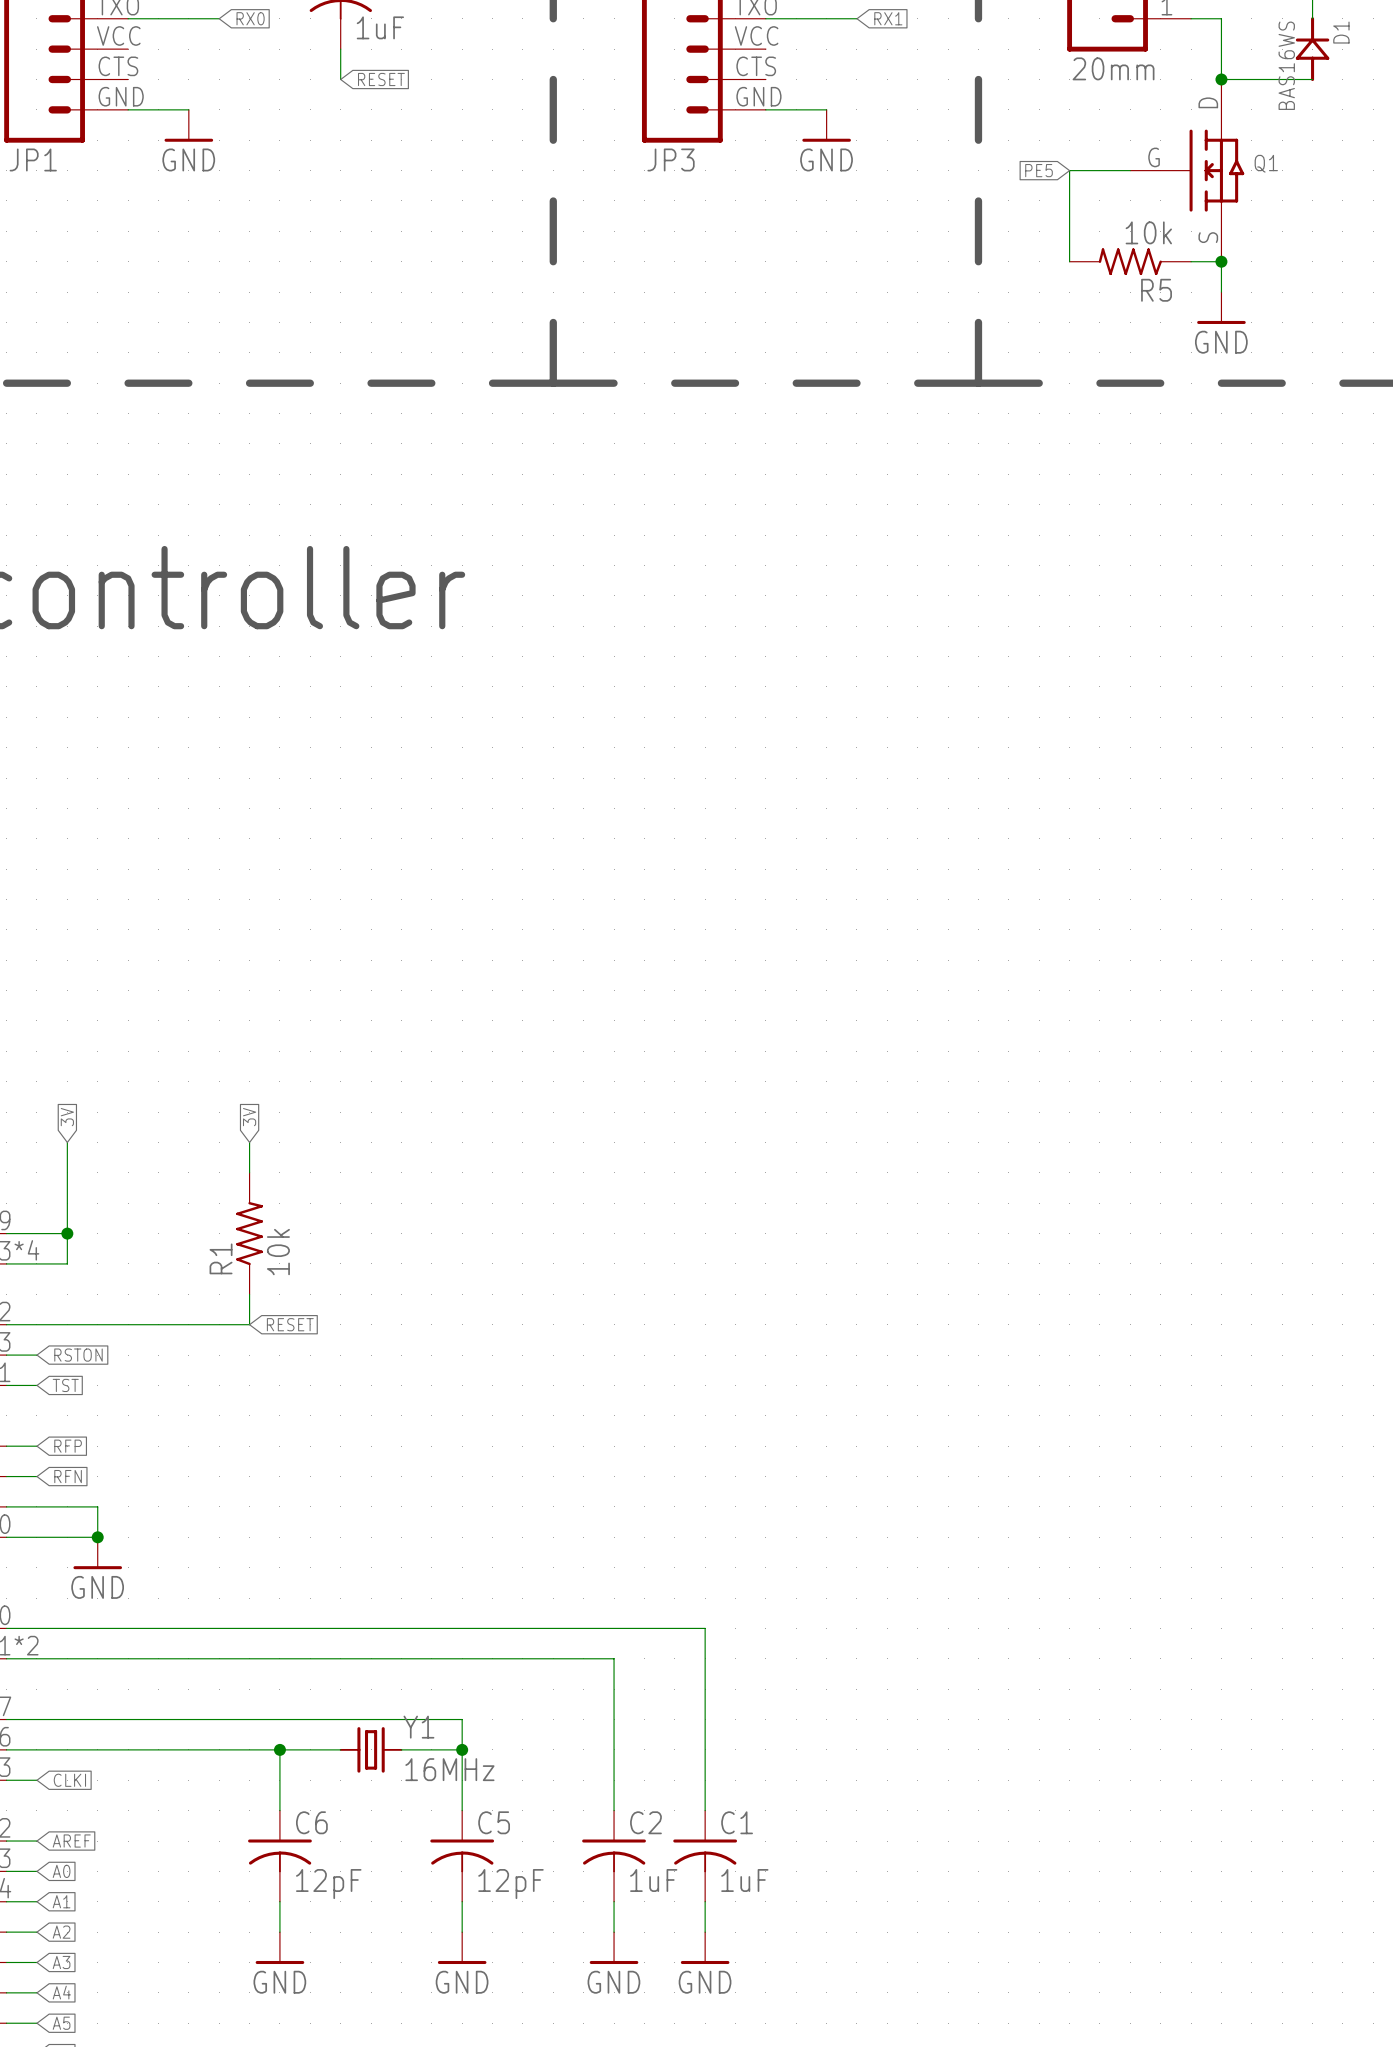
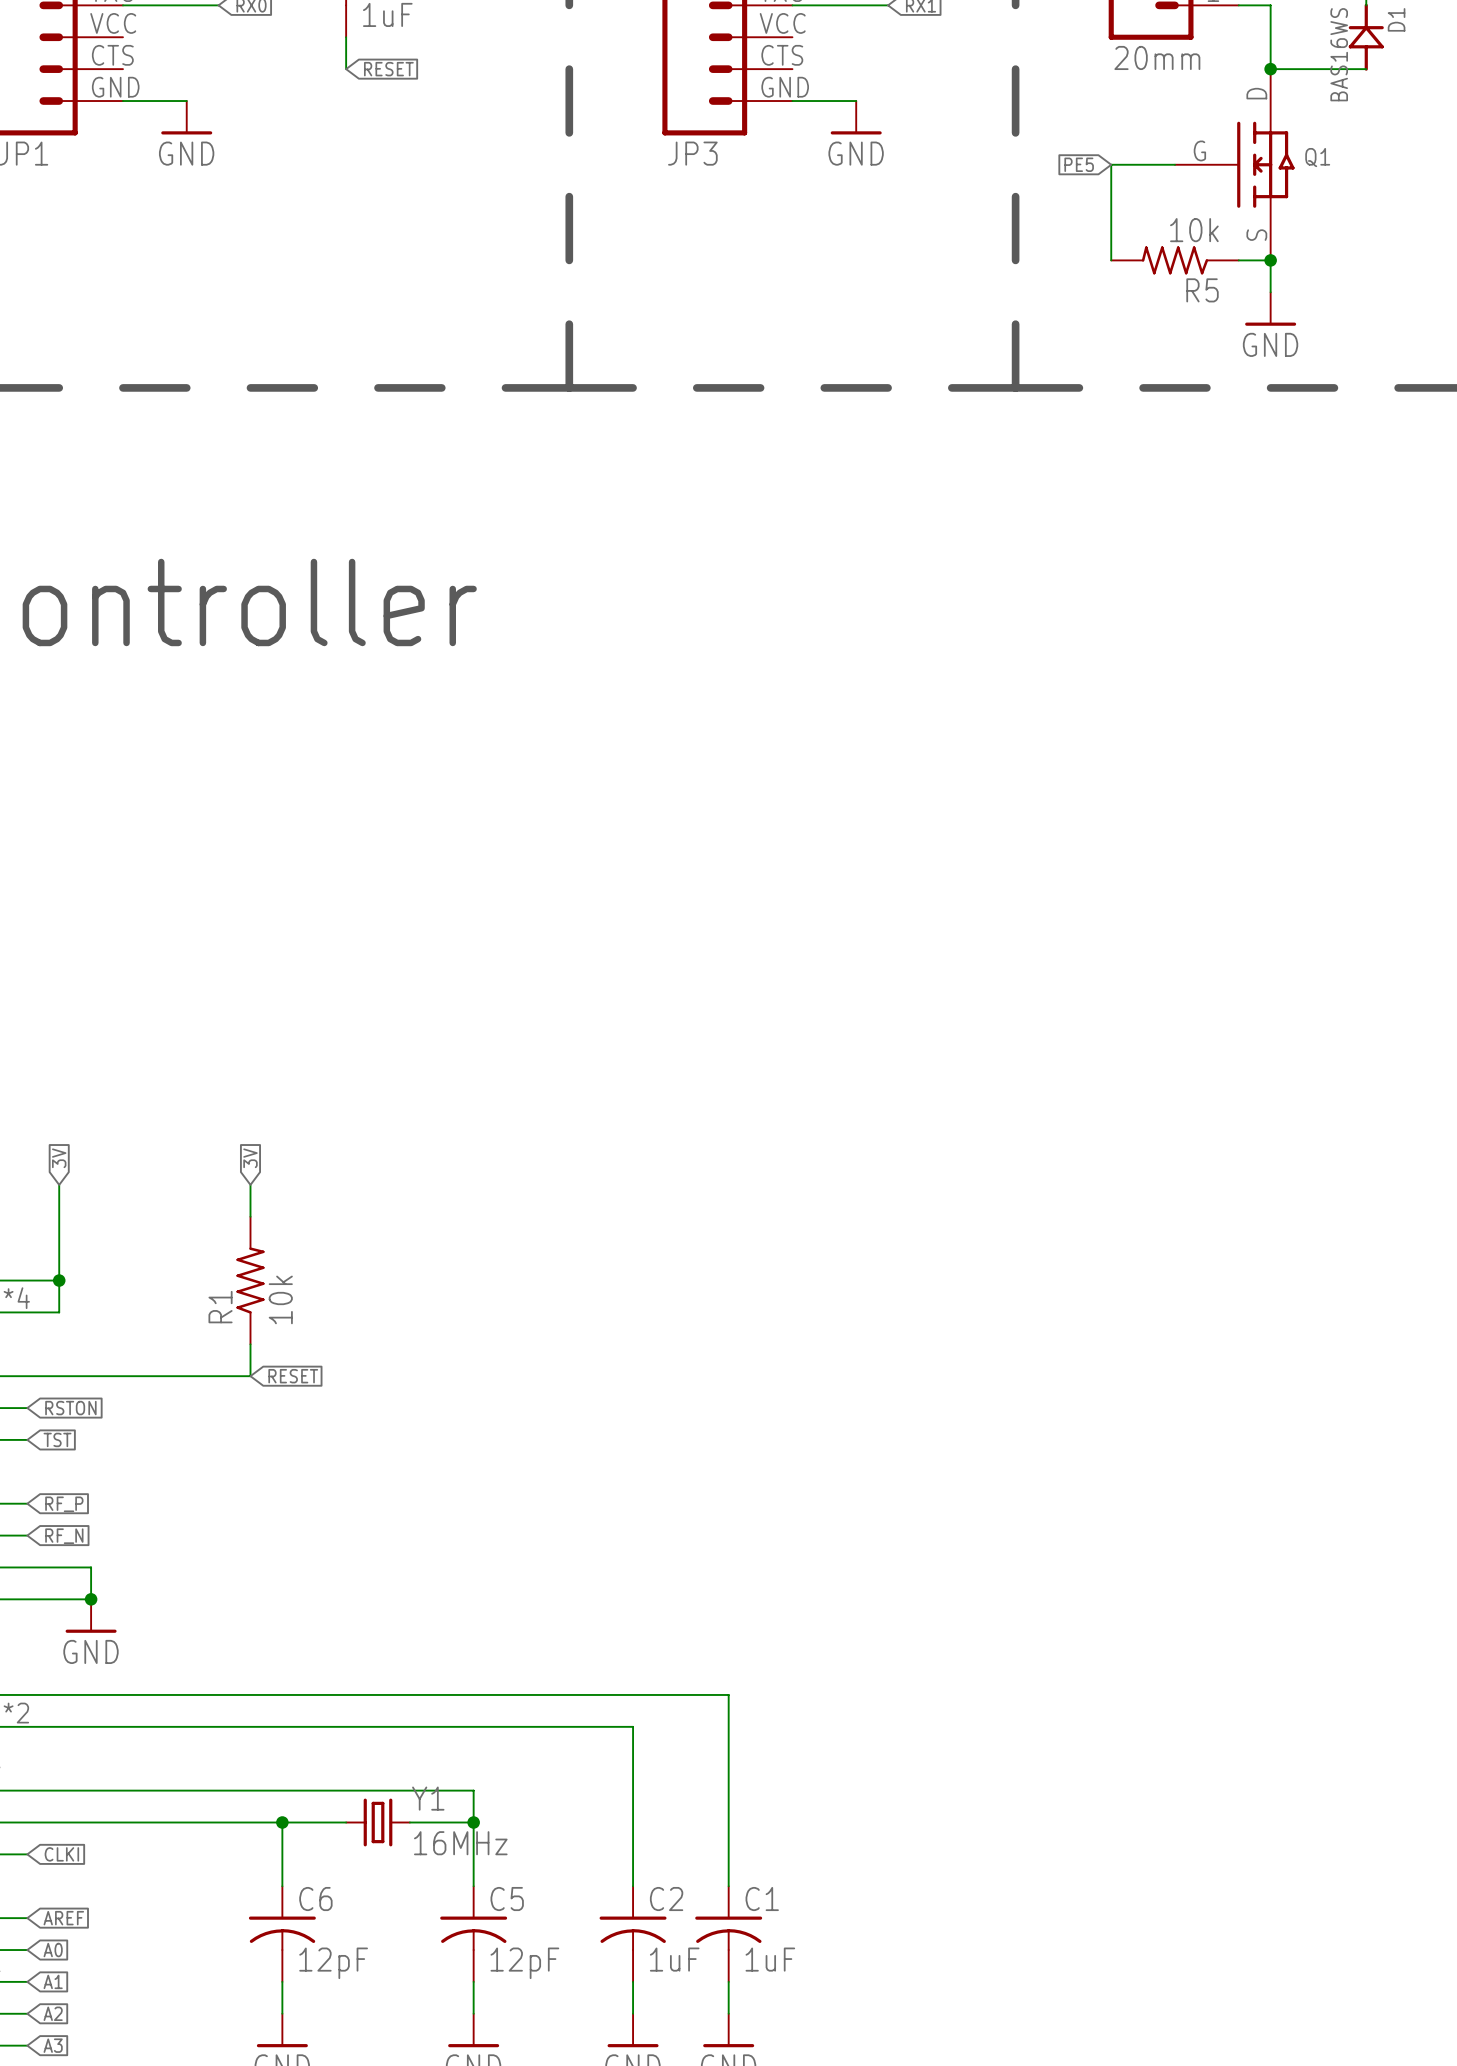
global label: RFP (68, 1446) -> RF_P (64, 1504)
global label: RFN (68, 1476) -> RF_N (64, 1536)

